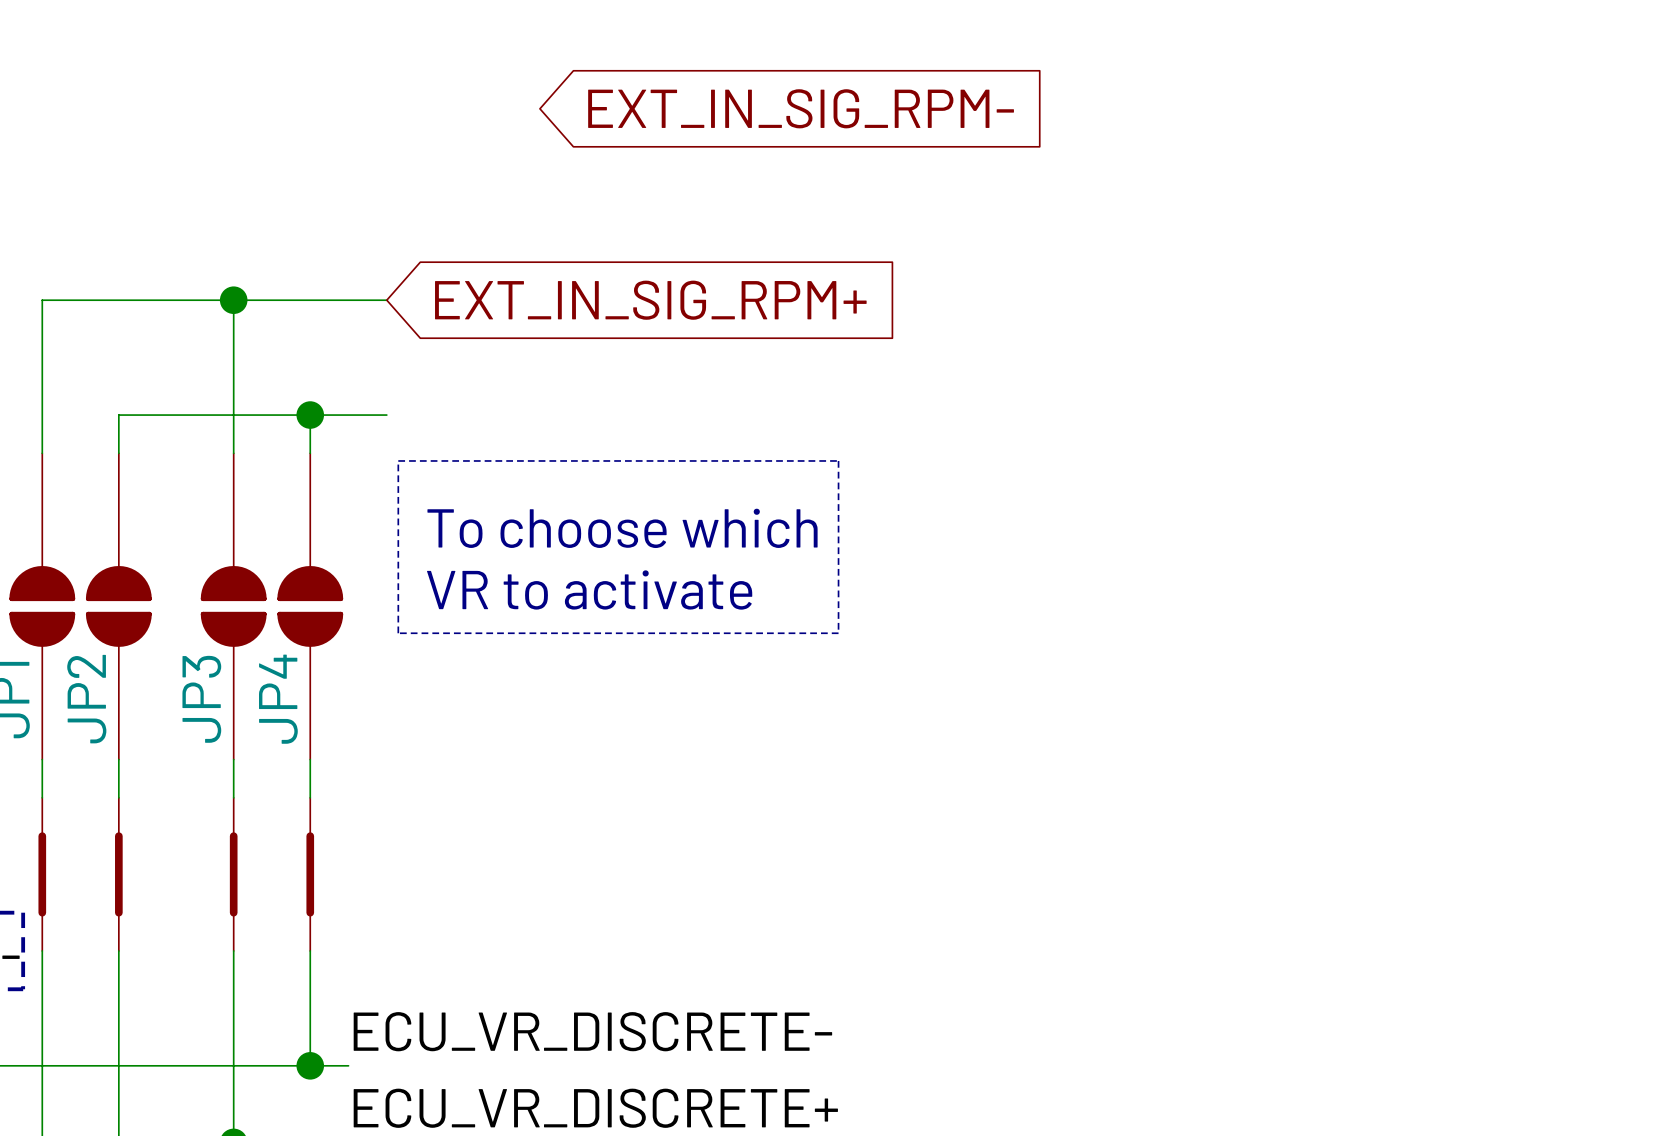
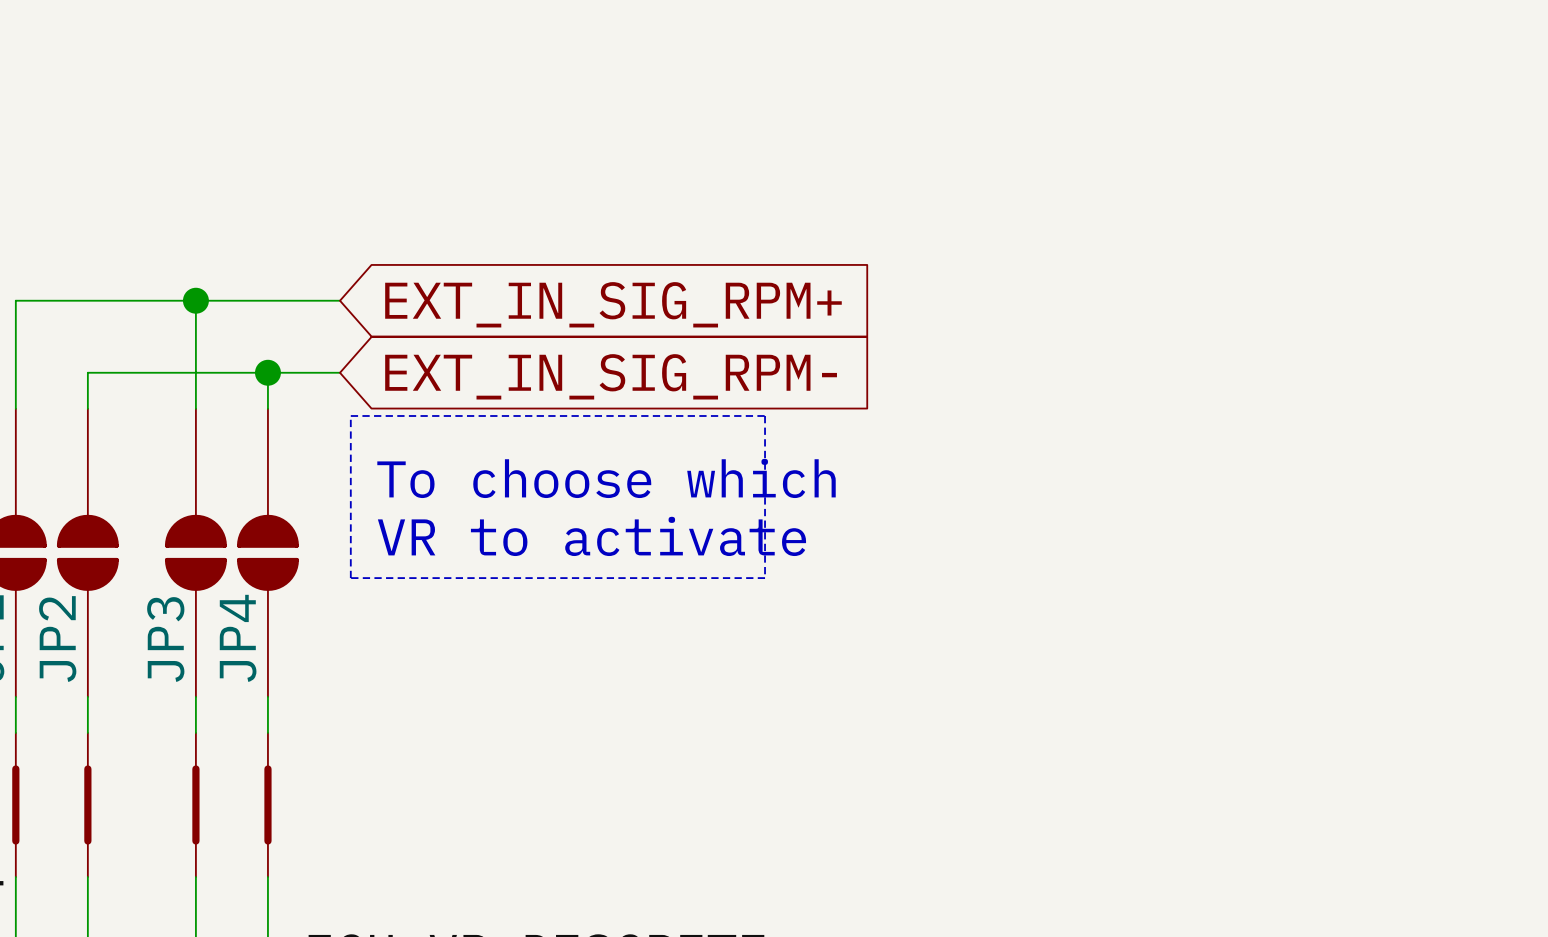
global label position: EXT_IN_SIG_RPM- (801, 108) -> EXT_IN_SIG_RPM- (611, 376)
wire: (233, 300) (233, 338) -> none
junction position: (233, 300) -> (195, 300)
wire: (386, 300) (42, 300) (42, 338) -> (340, 300) (15, 300)
global label position: EXT_IN_SIG_RPM+ (650, 300) -> EXT_IN_SIG_RPM+ (613, 304)

